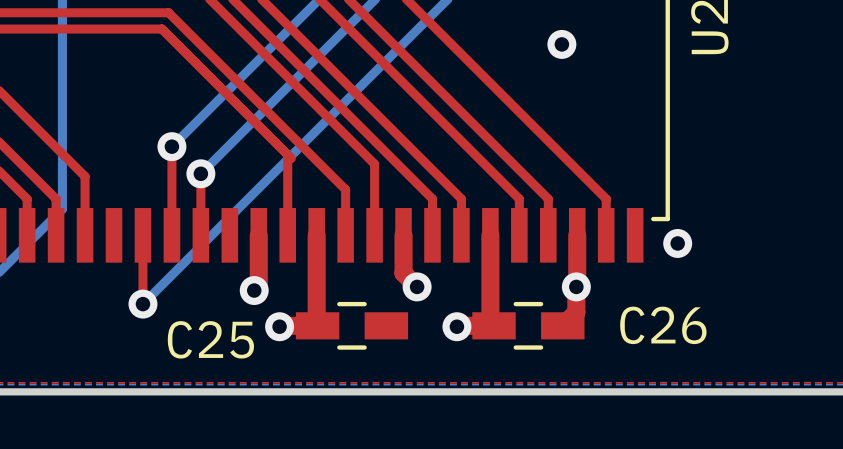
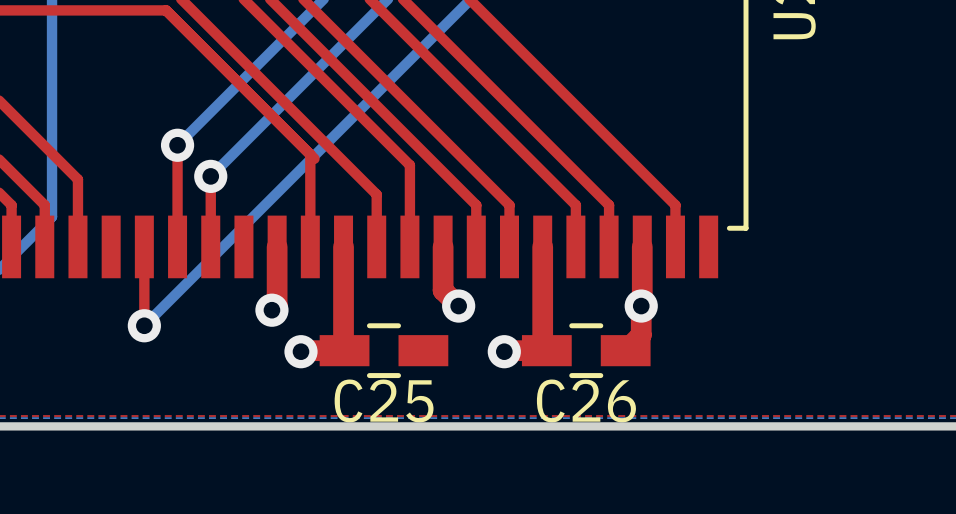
via: (561, 44) -> none
via: (677, 243) -> none
C26 name position: C26 (663, 325) -> C26 (586, 400)
C25 name position: C25 (210, 339) -> C25 (384, 400)

